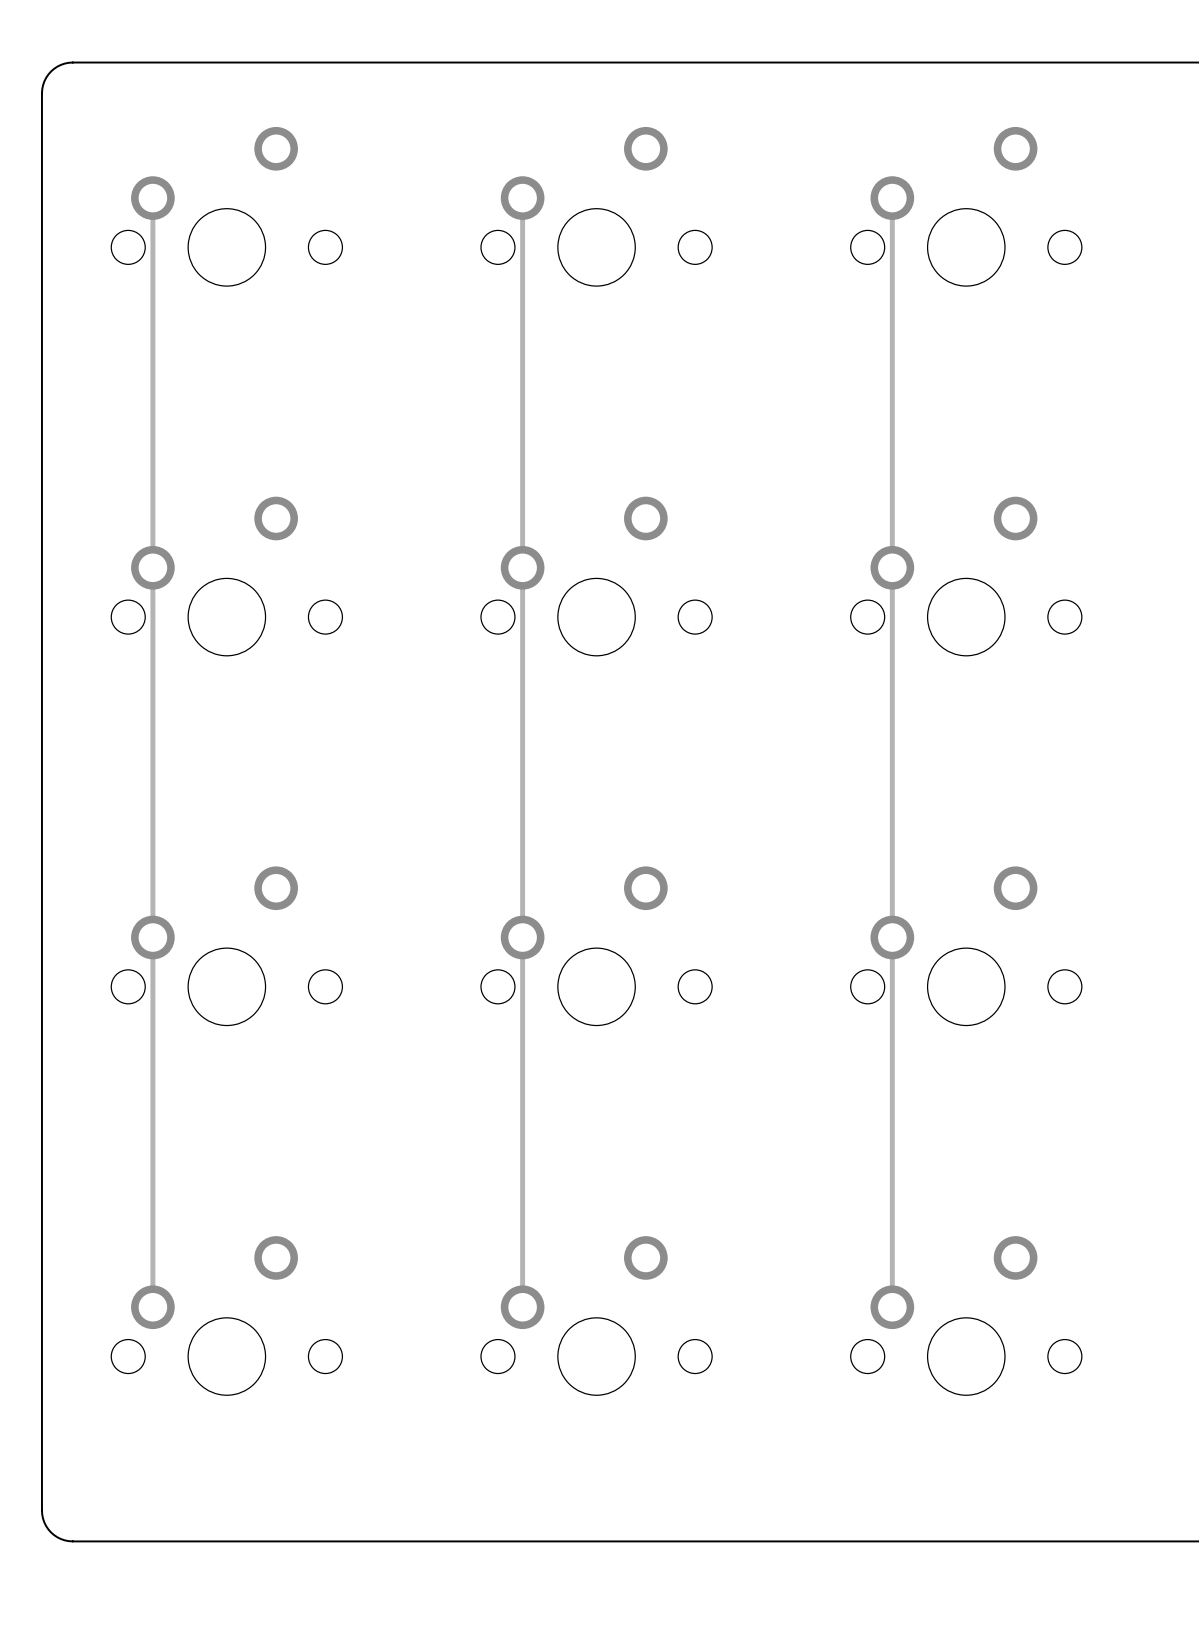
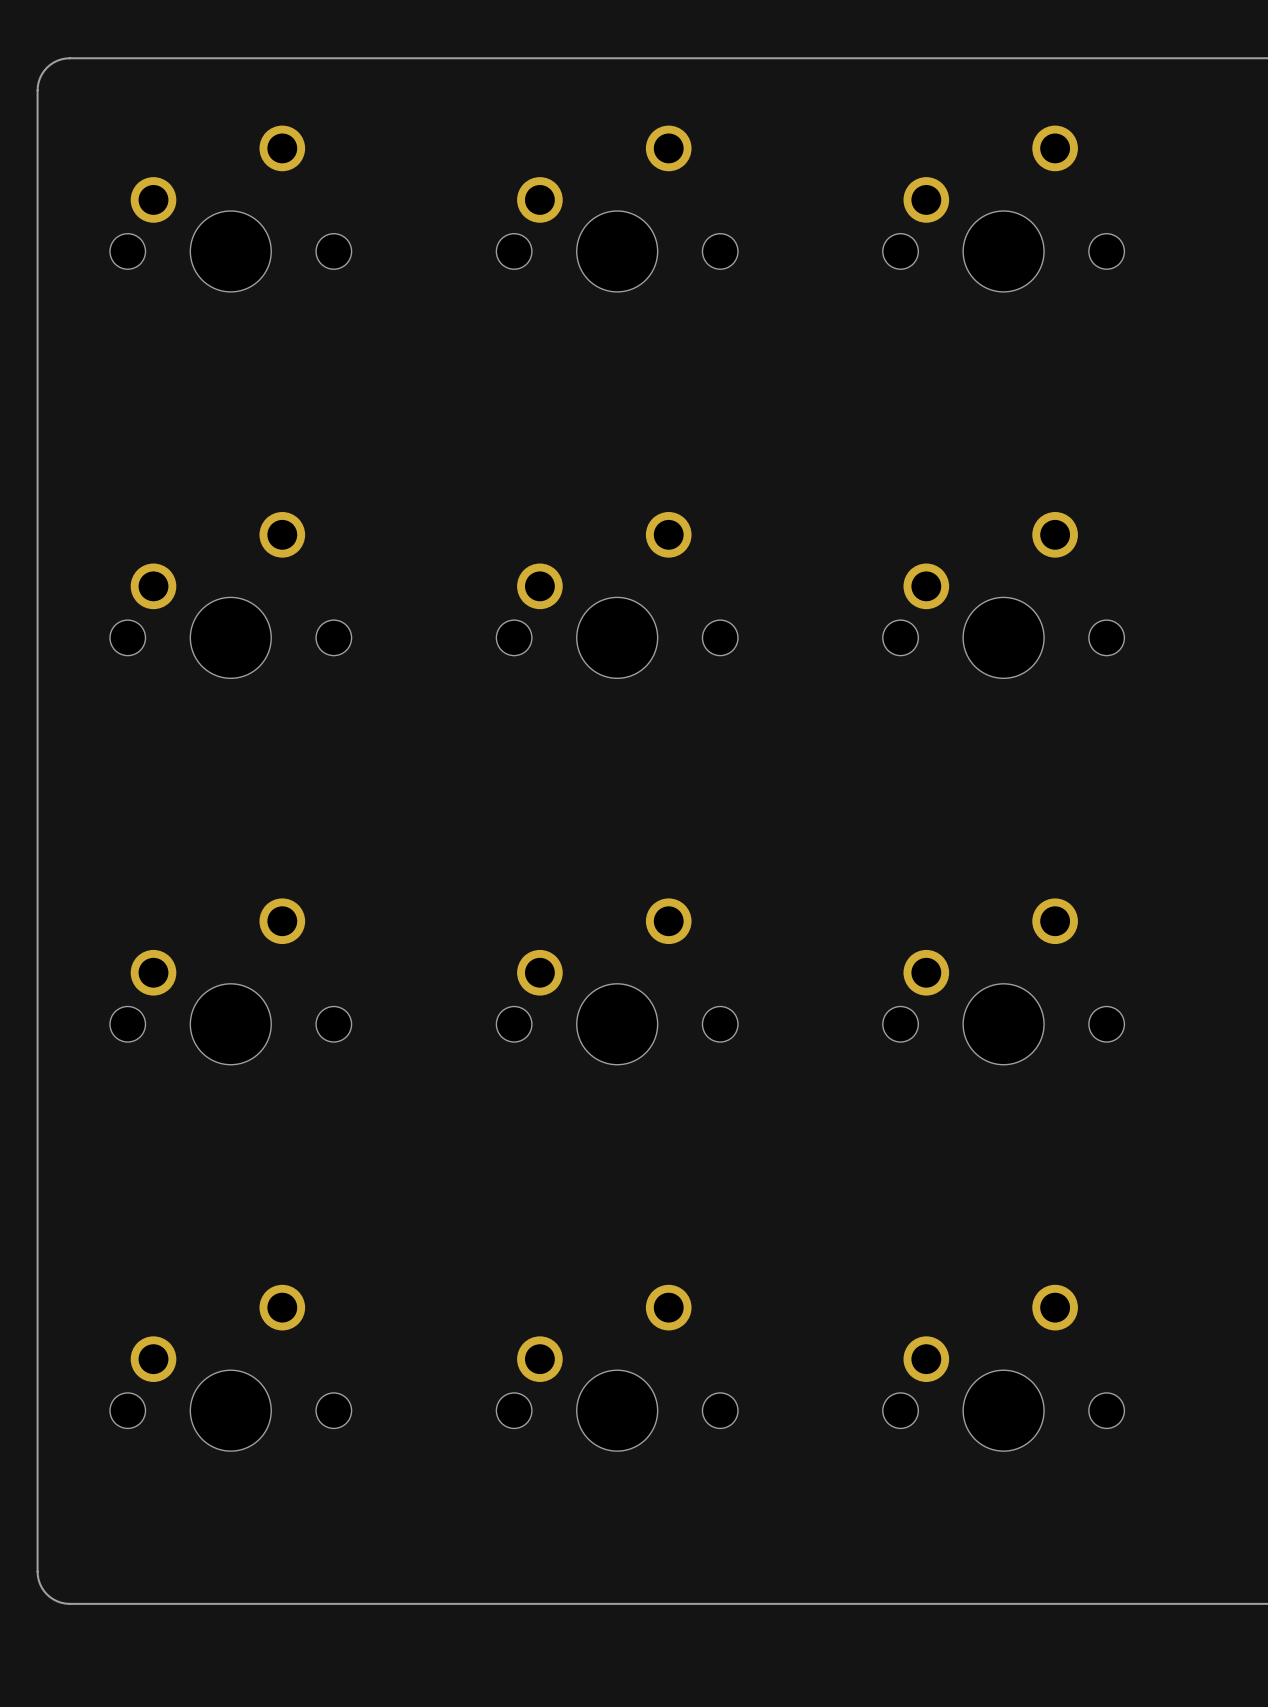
track: (152, 198) (152, 1307) -> none
track: (522, 198) (522, 1307) -> none
track: (892, 198) (892, 1307) -> none

